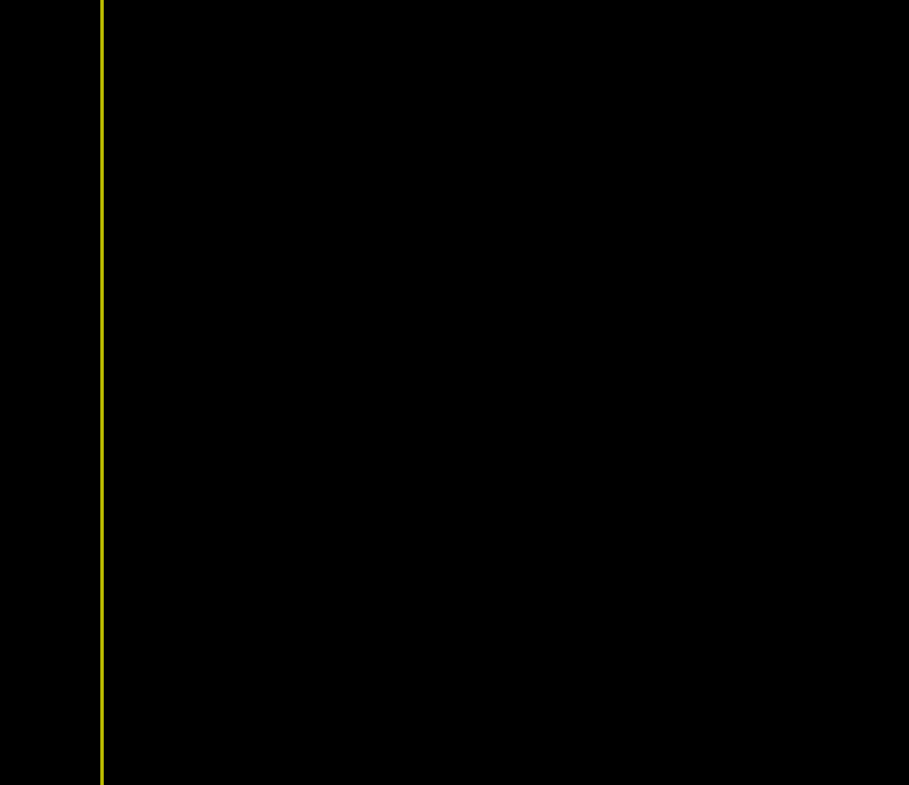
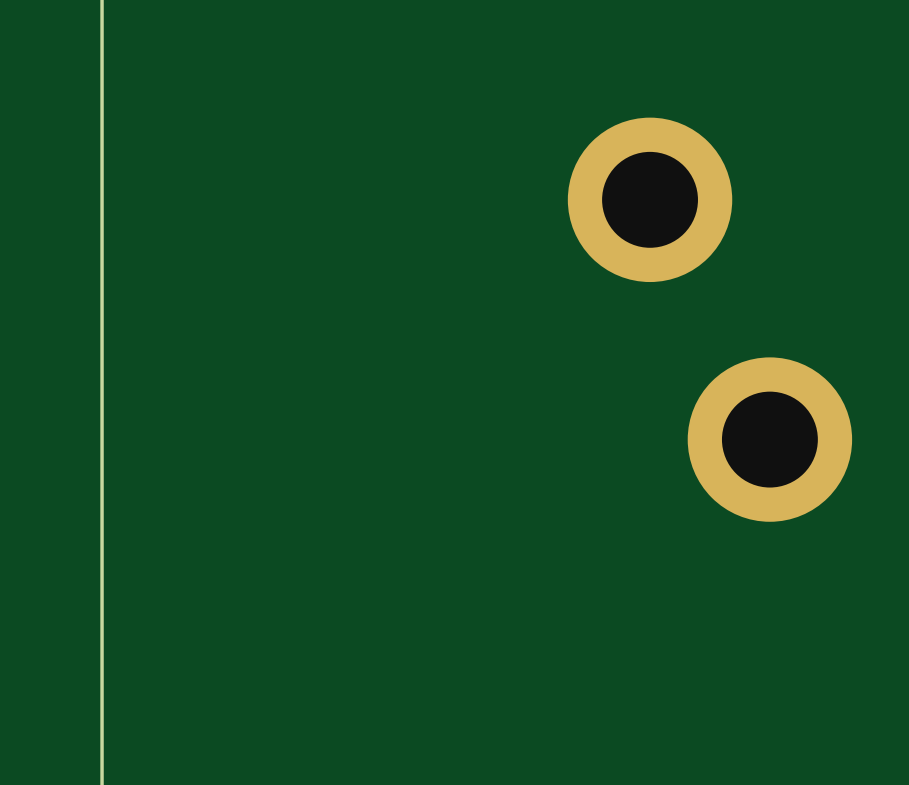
part: none -> (650, 199)
part: none -> (769, 439)

